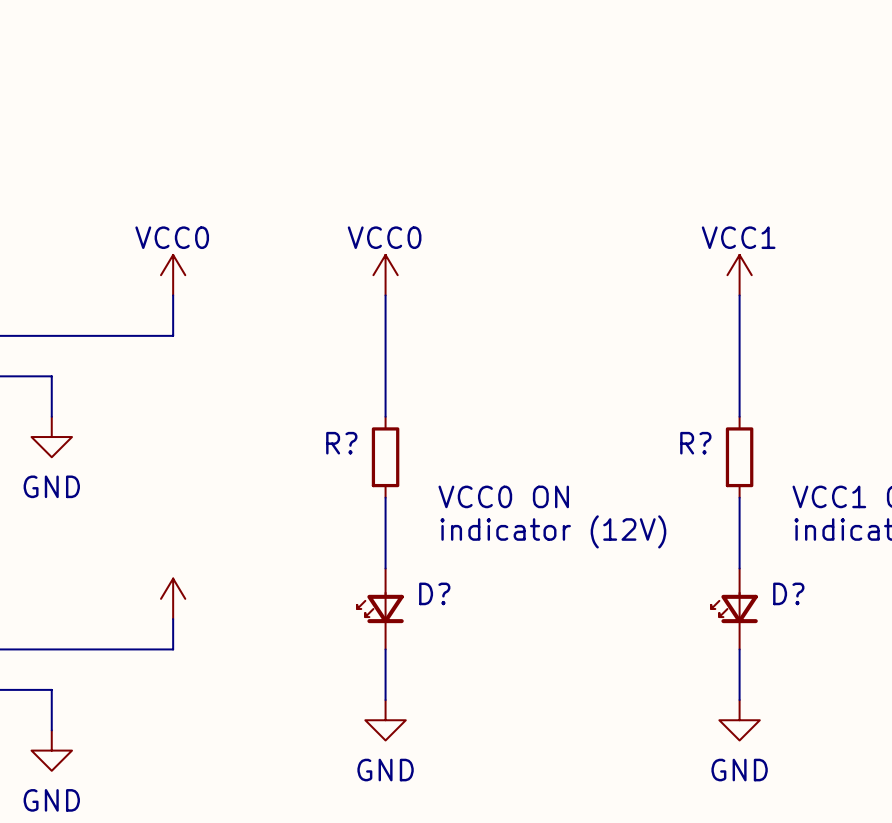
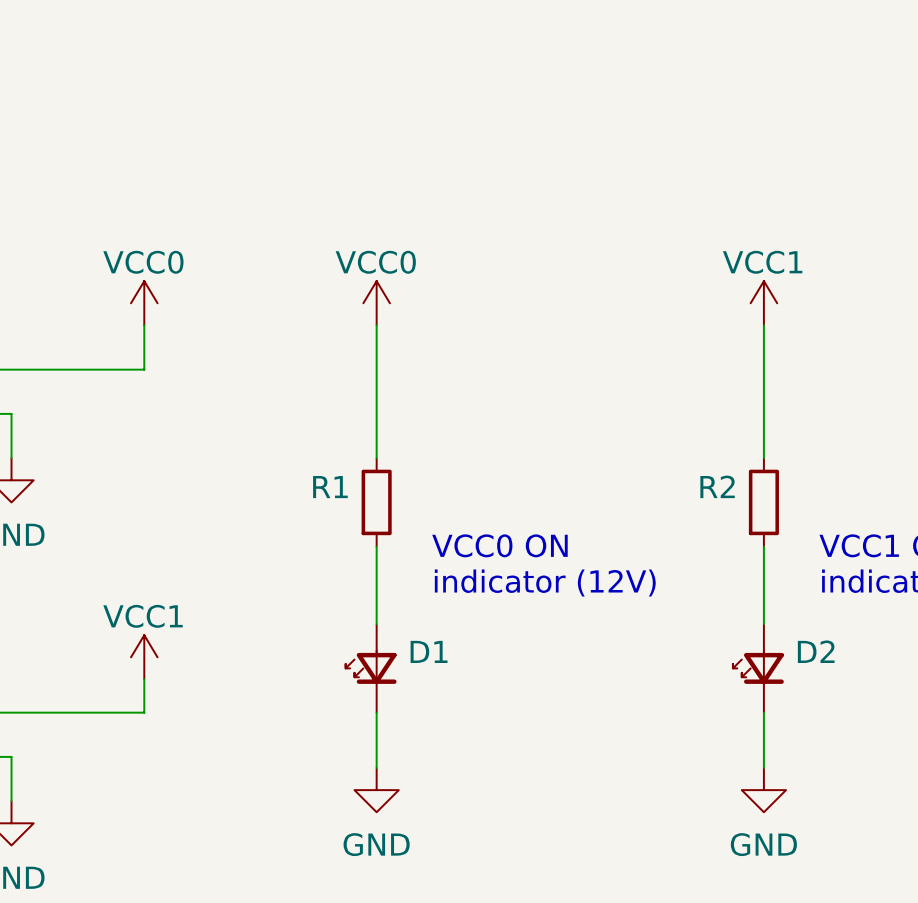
R? name: R? (341, 443) -> R1 (330, 487)
R? name: R? (695, 443) -> R2 (717, 486)
power symbol text: none -> VCC1 (143, 616)
D? name: D? (434, 593) -> D1 (429, 651)
D? name: D? (788, 593) -> D2 (816, 651)

